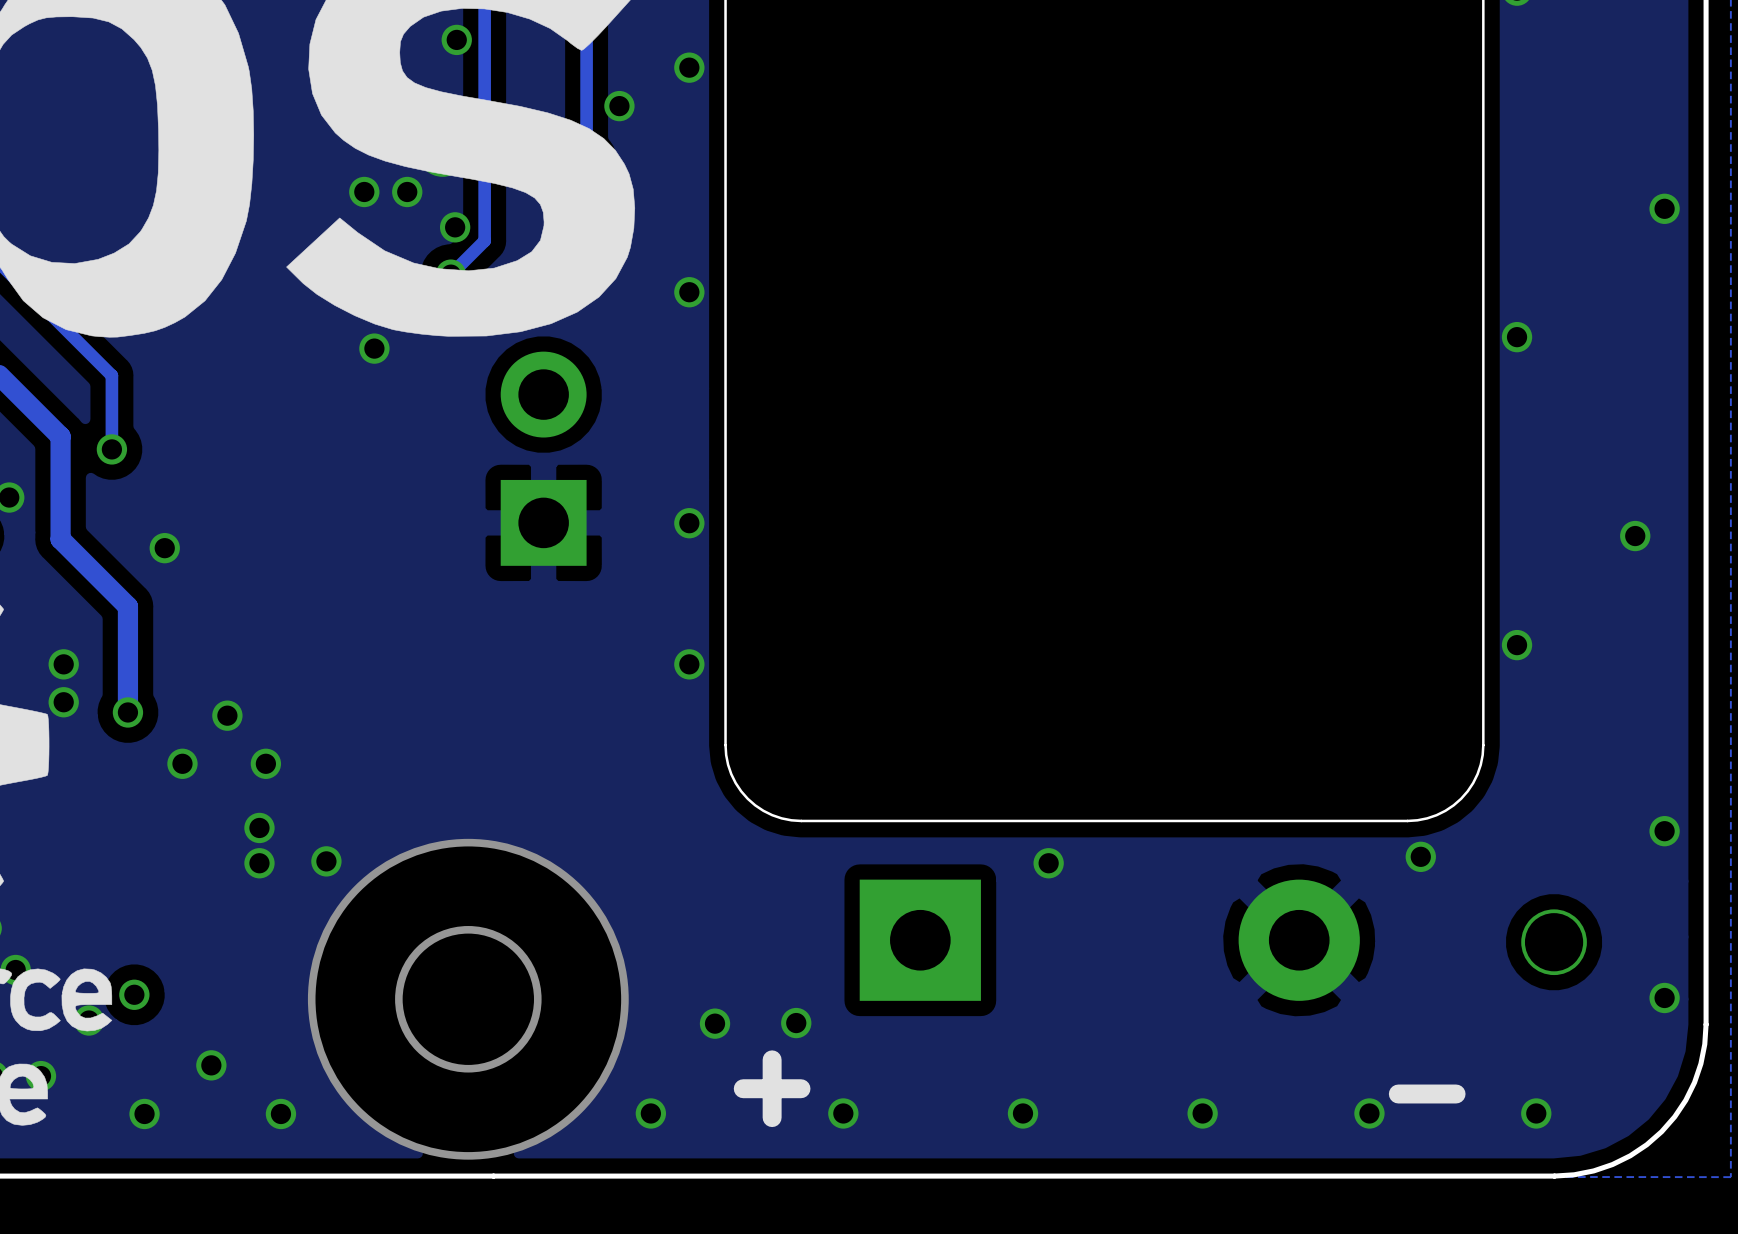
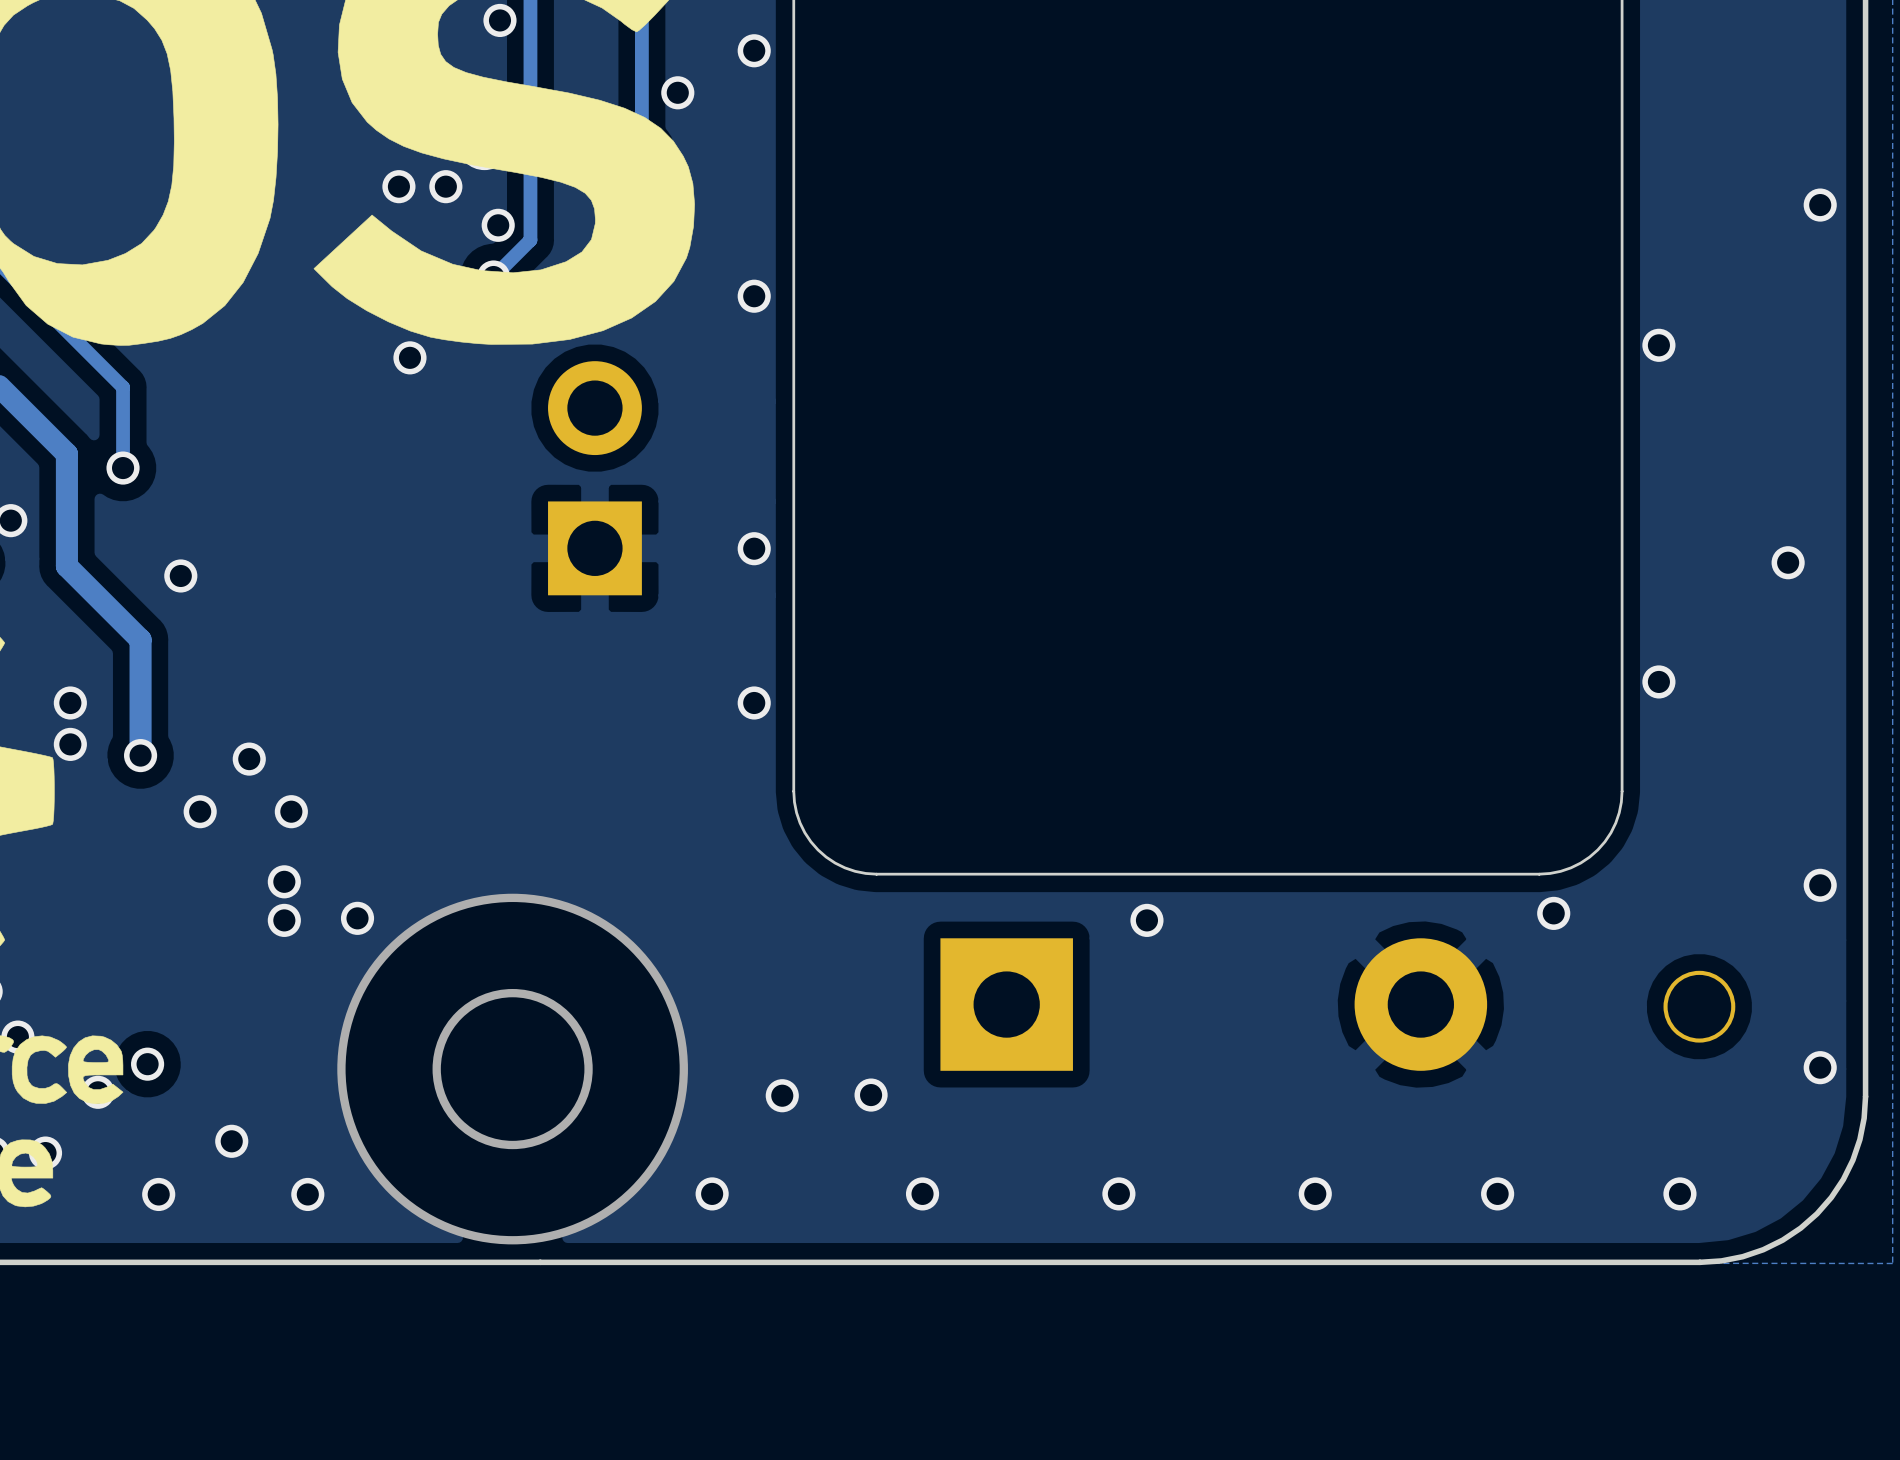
text: + (772, 1088) -> none
text: - (1427, 1094) -> none

